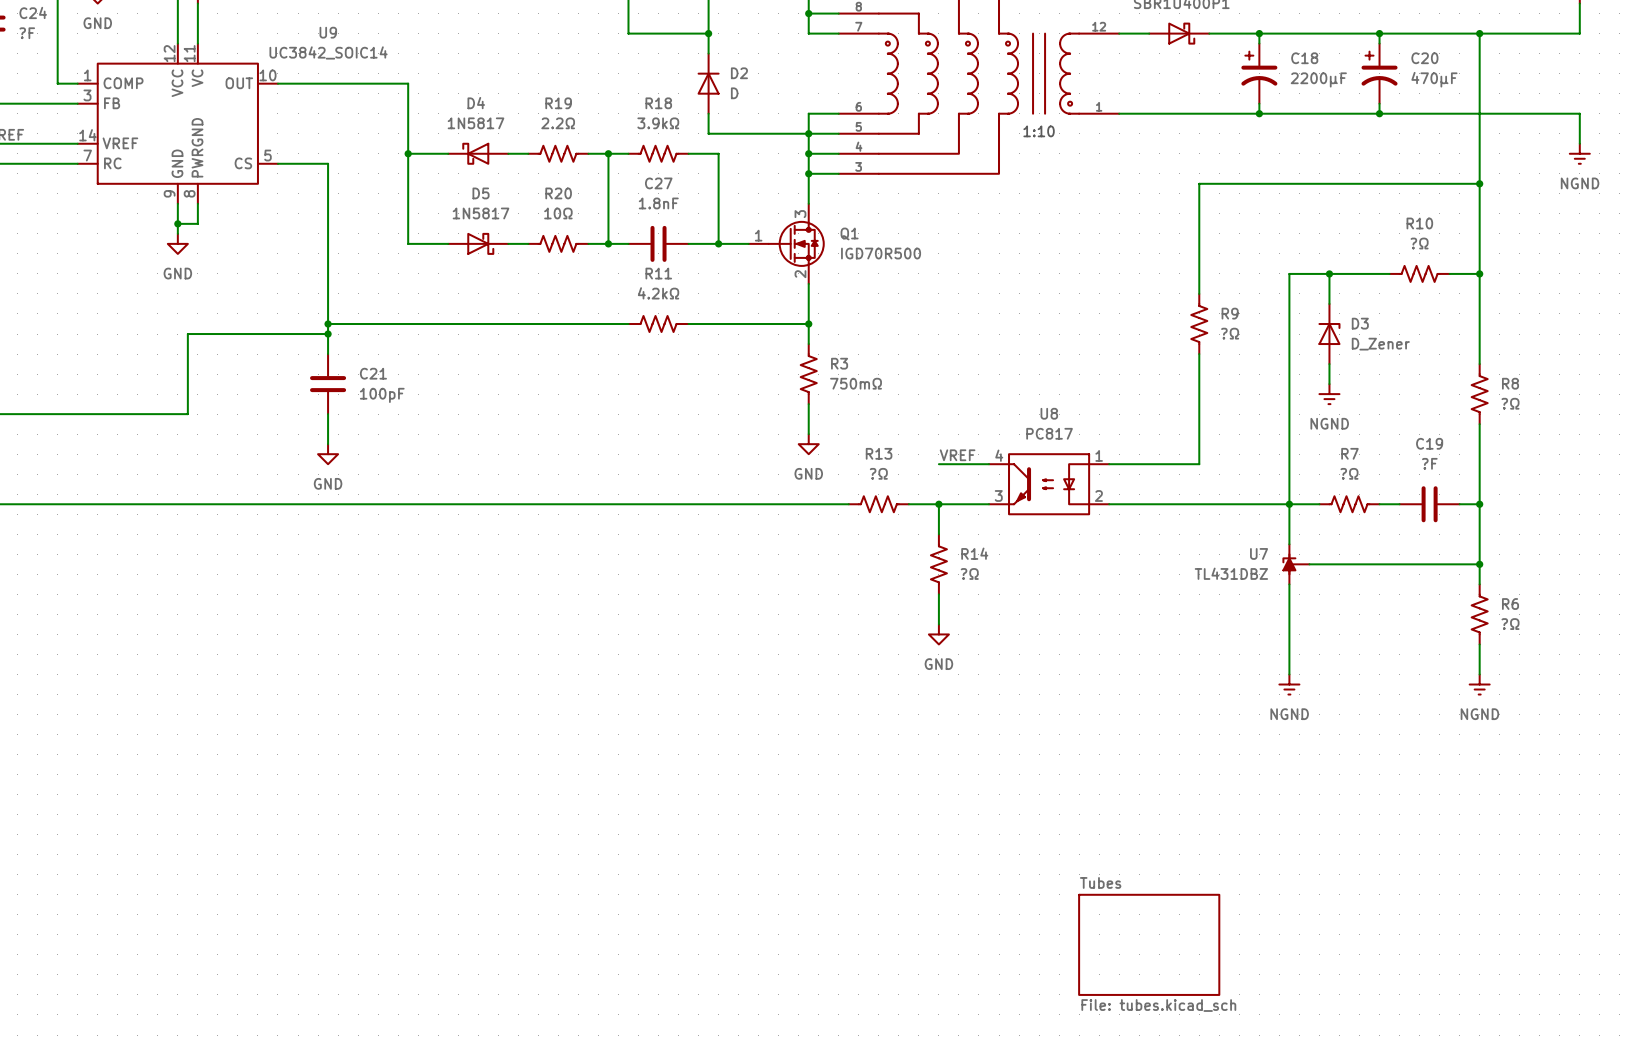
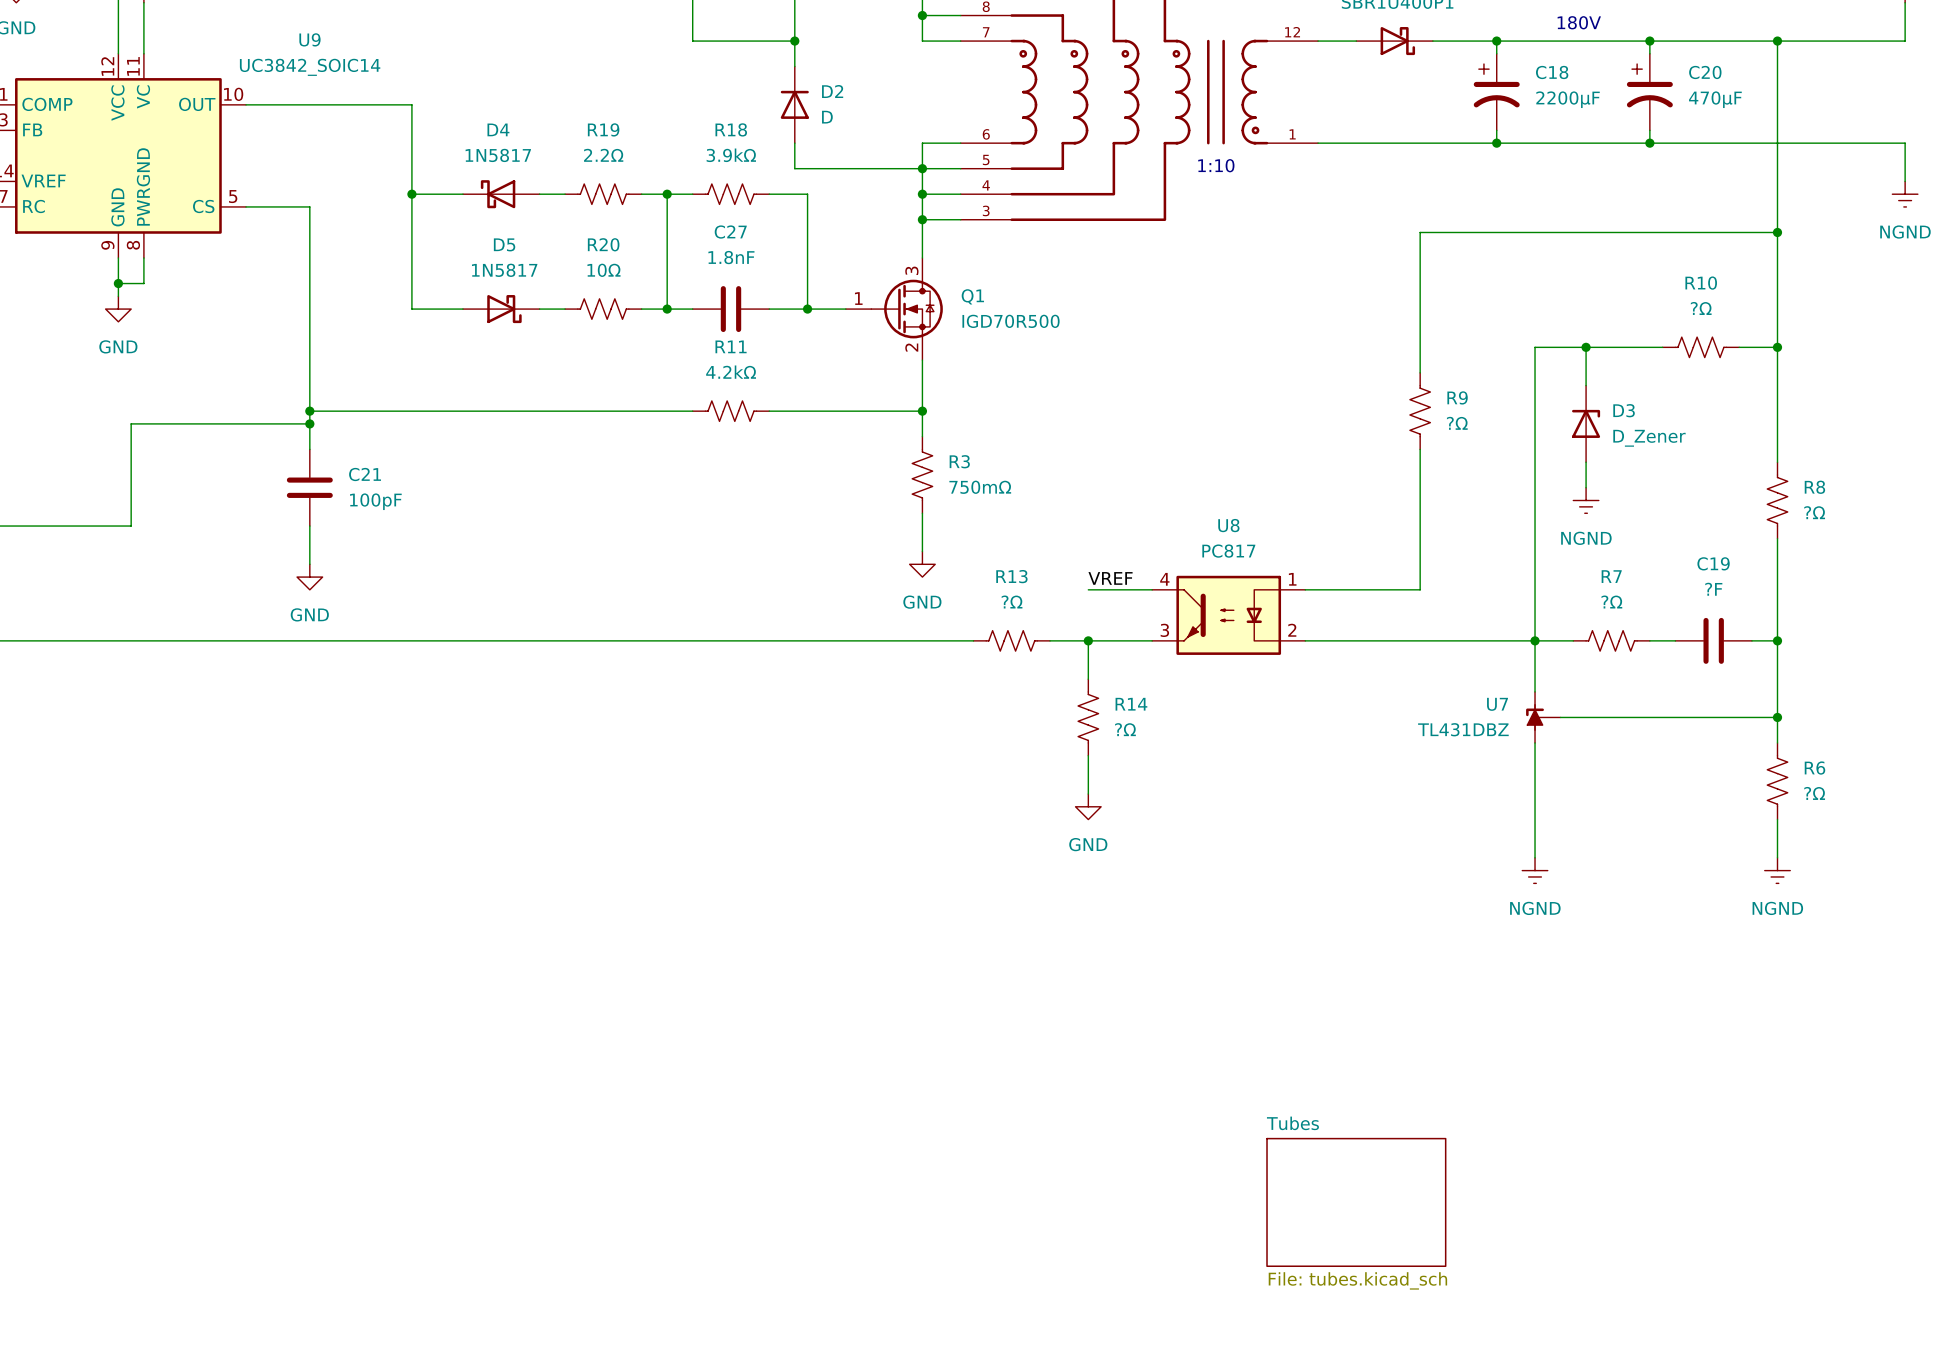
text: none -> 180V (1579, 22)

